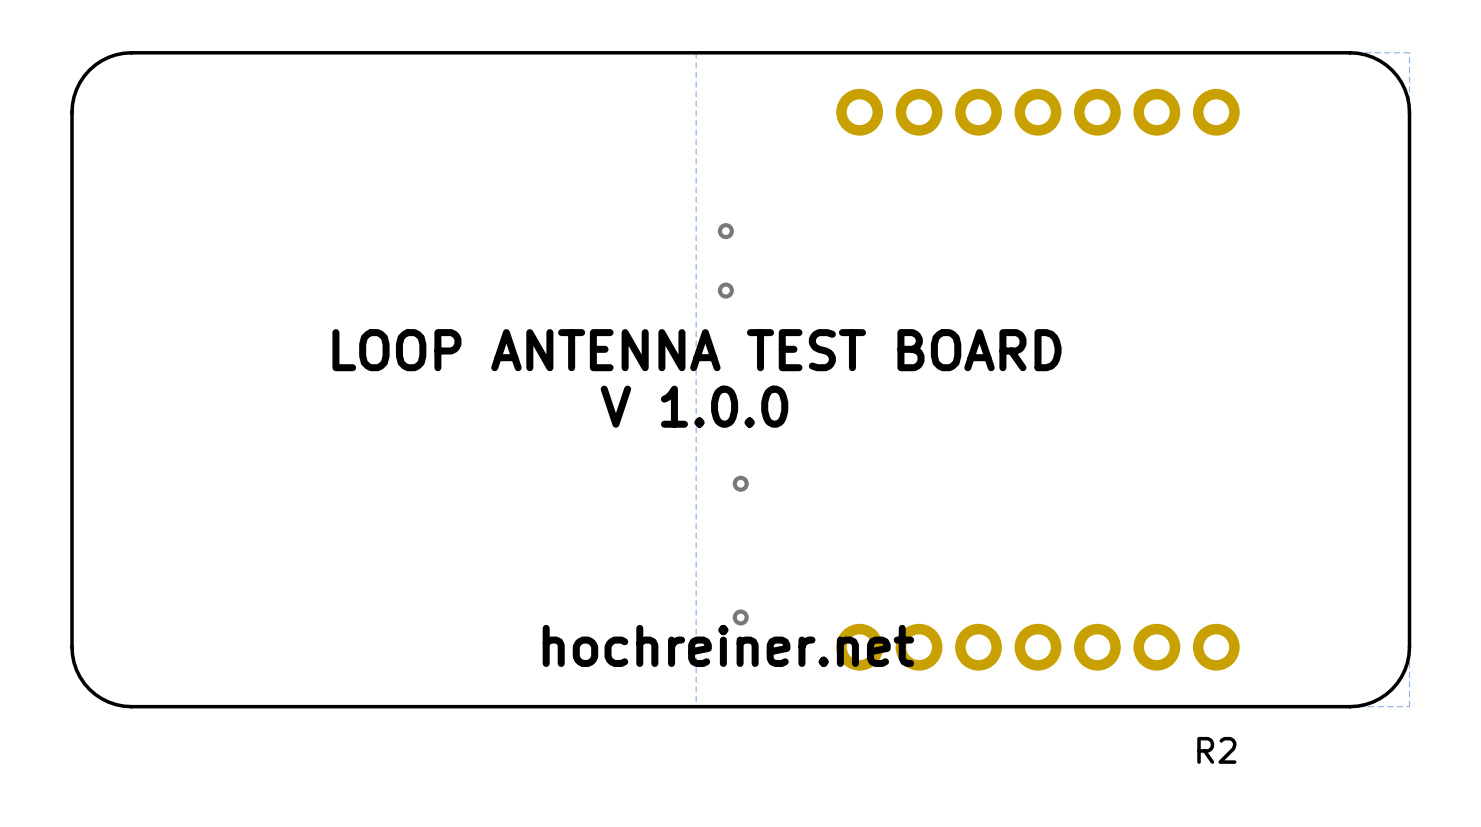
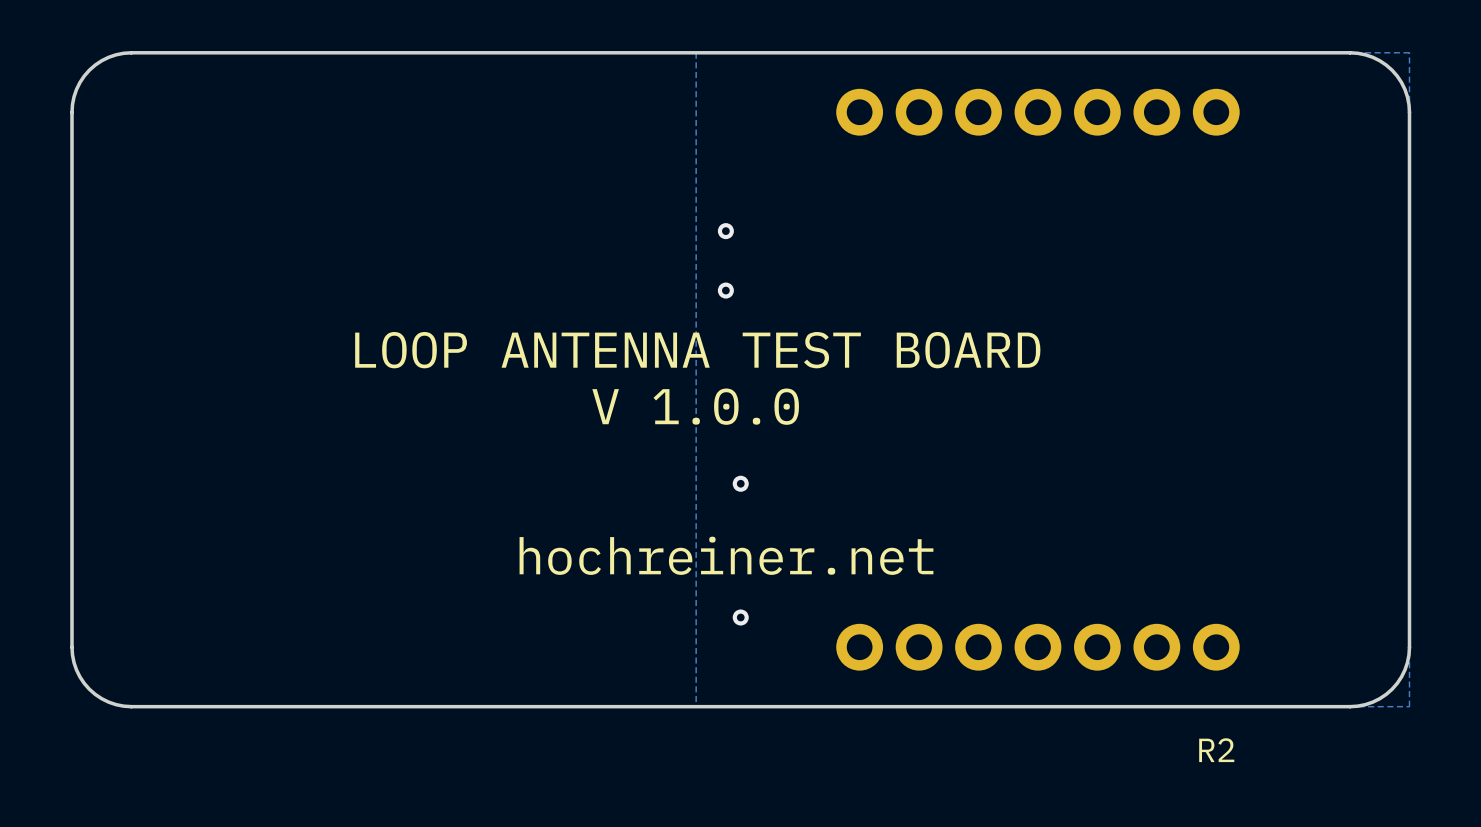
text position: hochreiner.net (728, 645) -> hochreiner.net (726, 555)

